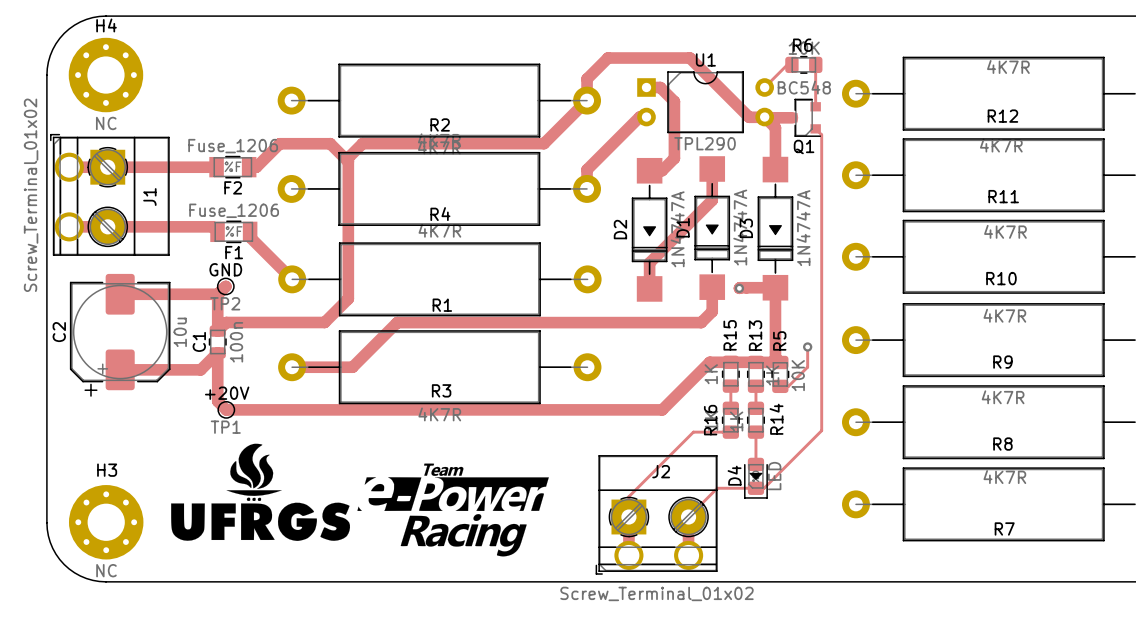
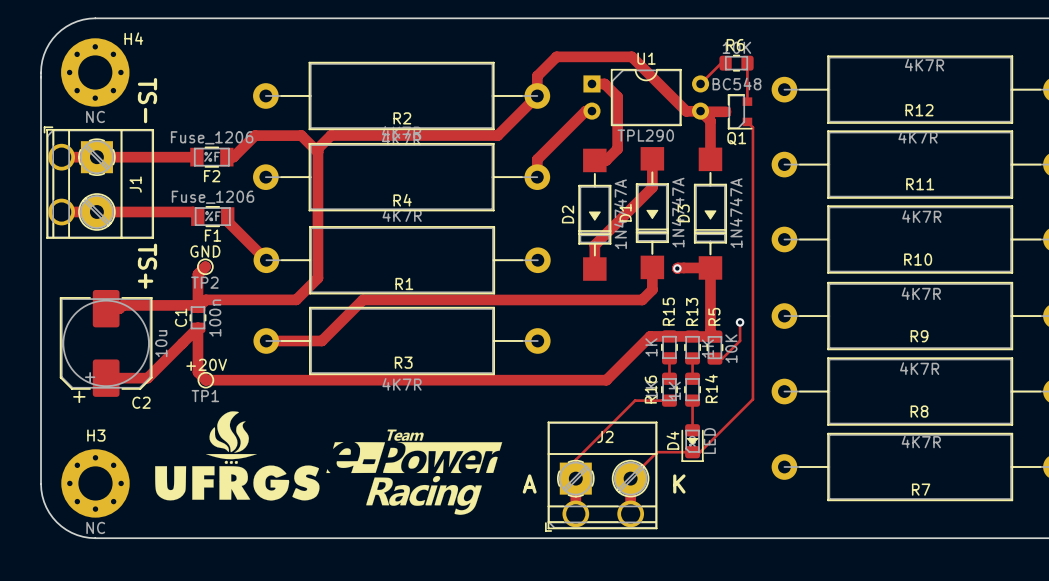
H4 name position: H4 (106, 25) -> H4 (133, 38)
text: none -> TS- (147, 100)
J1 value: Screw_Terminal_01x02 (31, 195) -> none
text: none -> TS+ (147, 266)
track: (120, 294) (218, 294) -> none
track: none -> (198, 305) (122, 305) (119, 308) (106, 308)
C2 name rotation: 0° (59, 332) -> 90° clockwise (141, 402)
C2 name position: C2 (59, 332) -> C2 (141, 402)
C2 position: (120, 335) -> (106, 346)
track: (120, 369) (200, 369) -> (106, 378) (147, 378) (182, 343)
text: none -> A (529, 483)
text: none -> K (679, 483)
J2 value: Screw_Terminal_01x02 (656, 593) -> none

